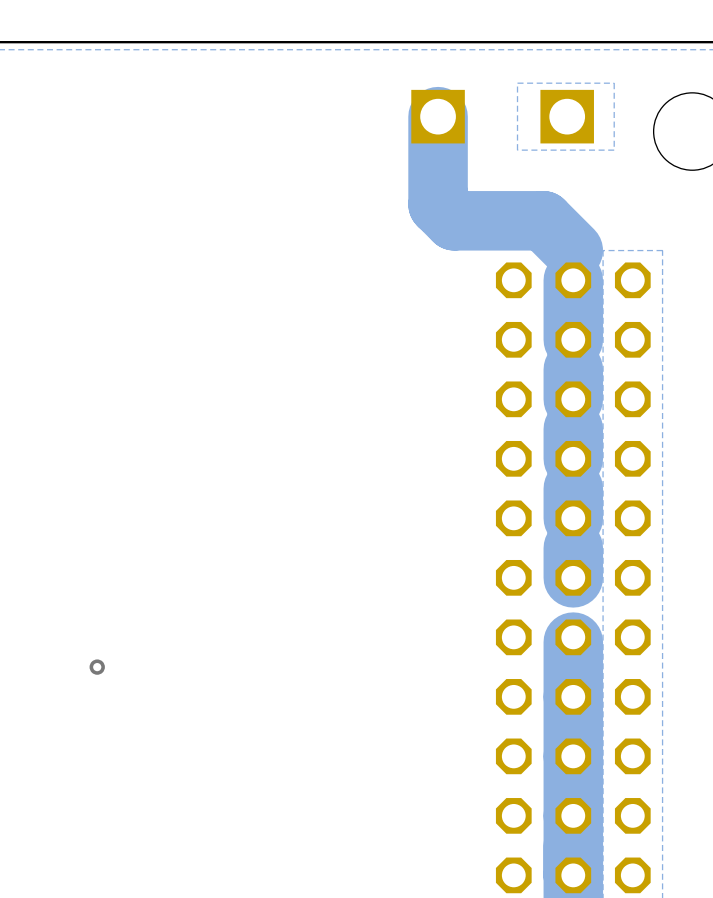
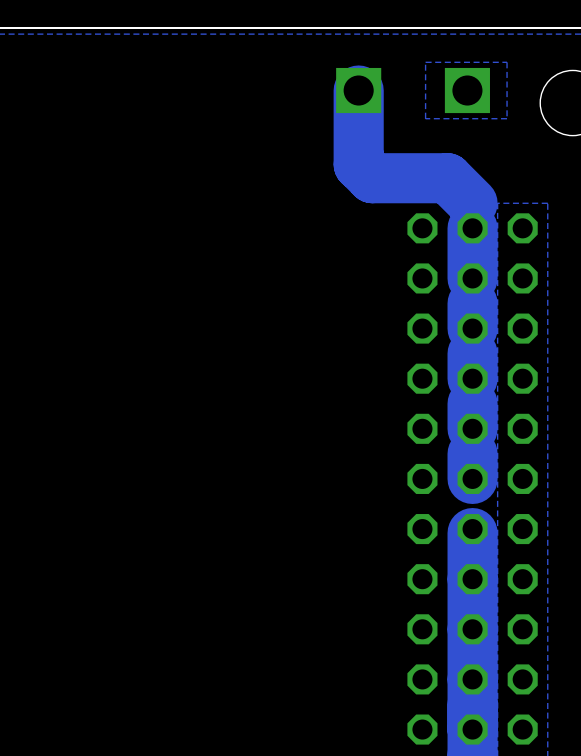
via: (97, 667) -> none

